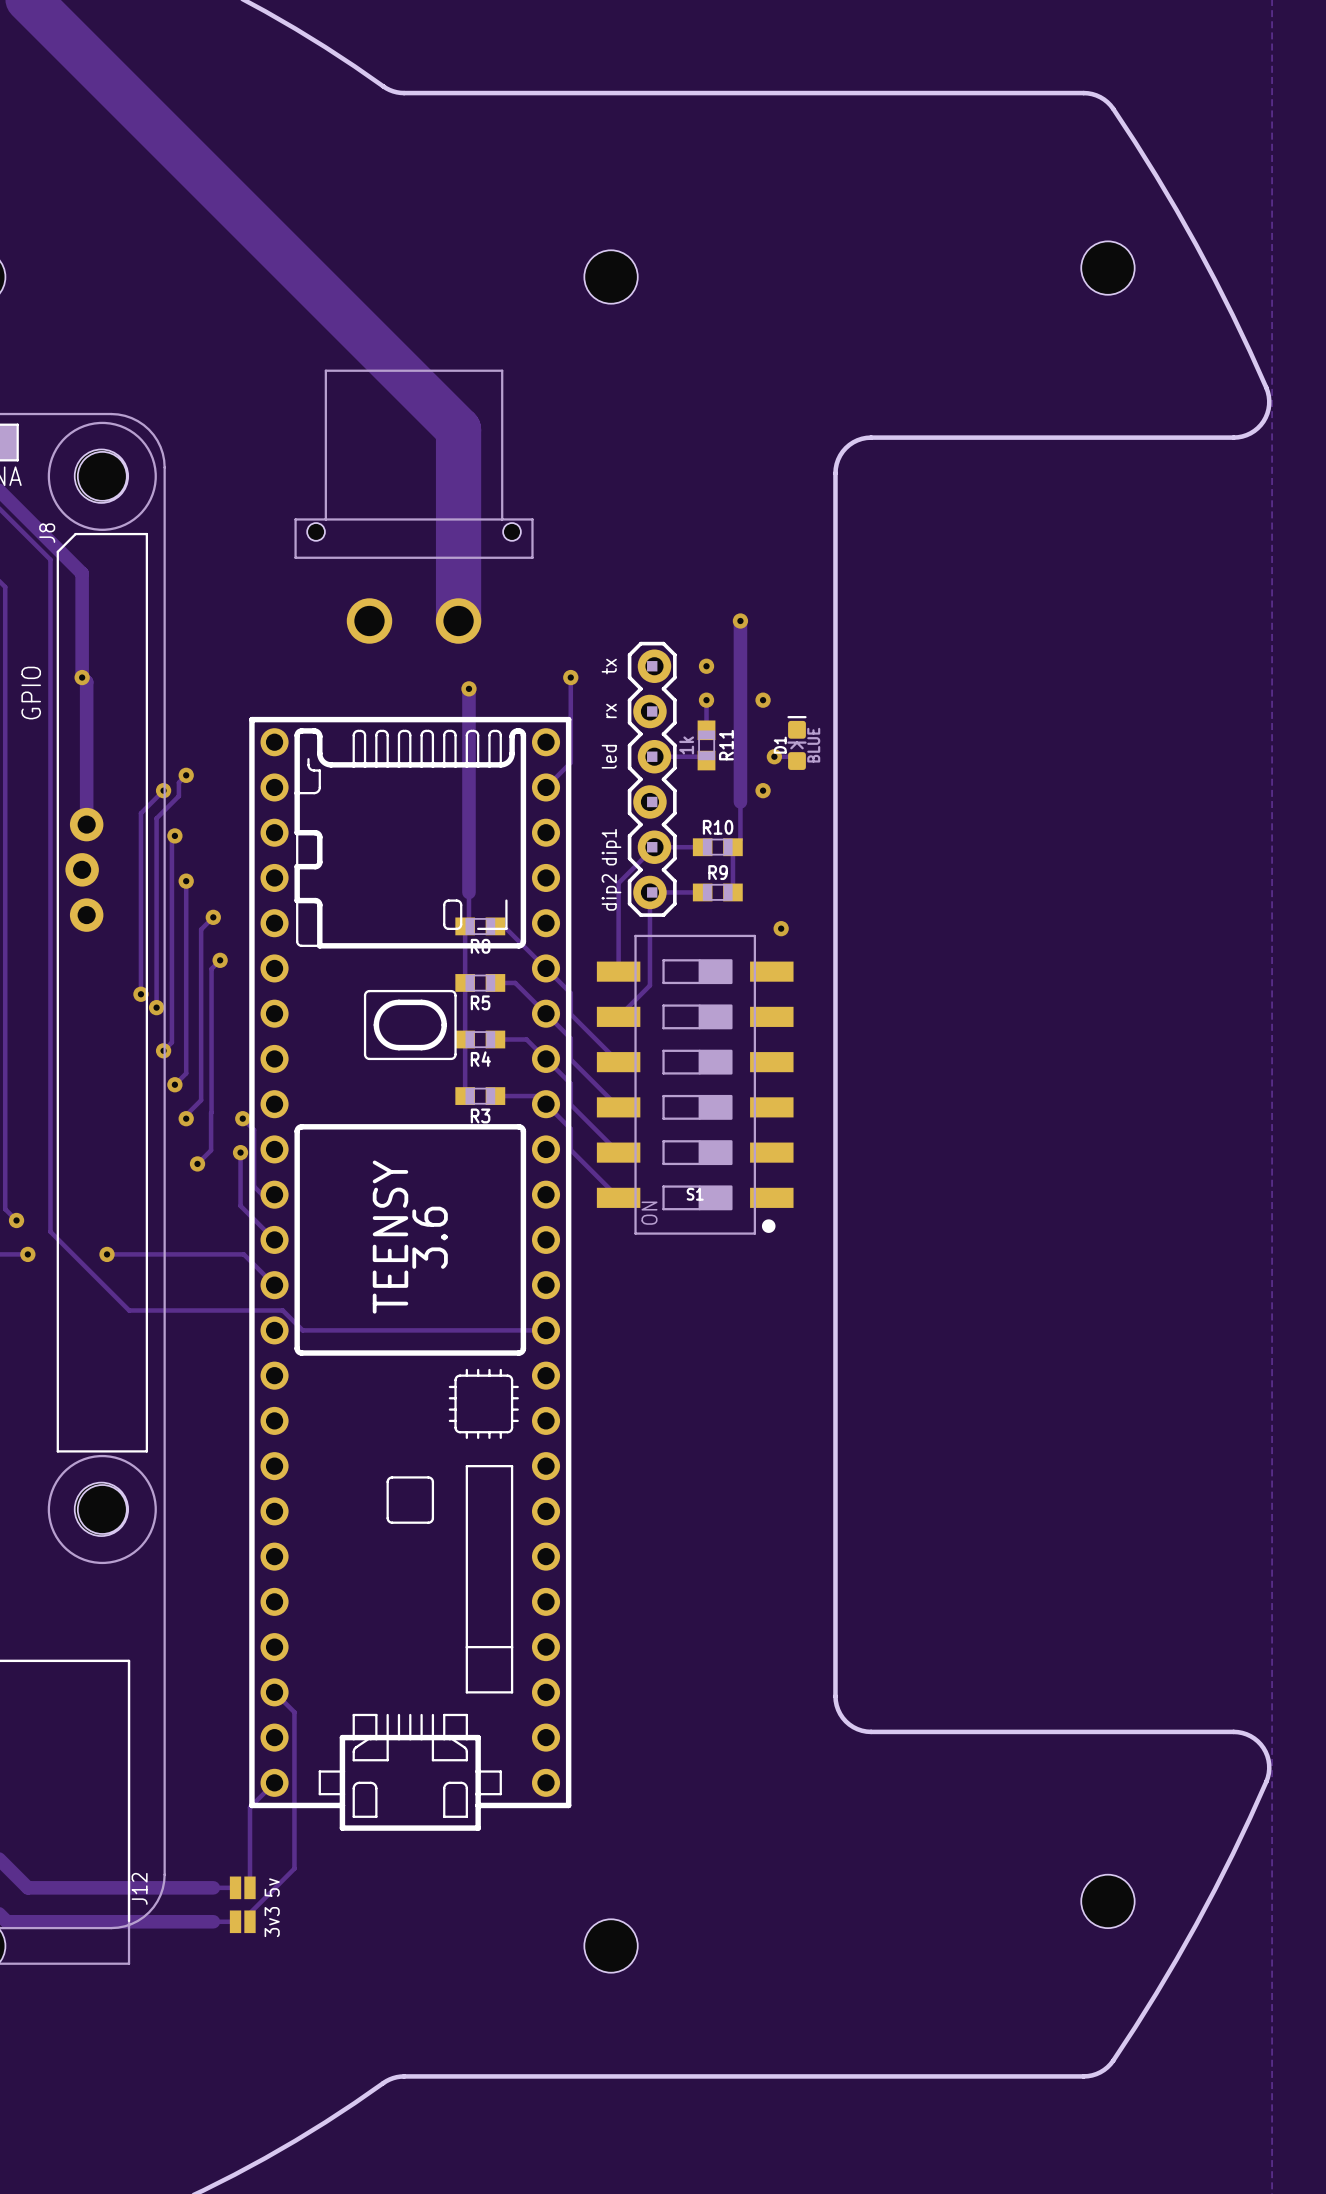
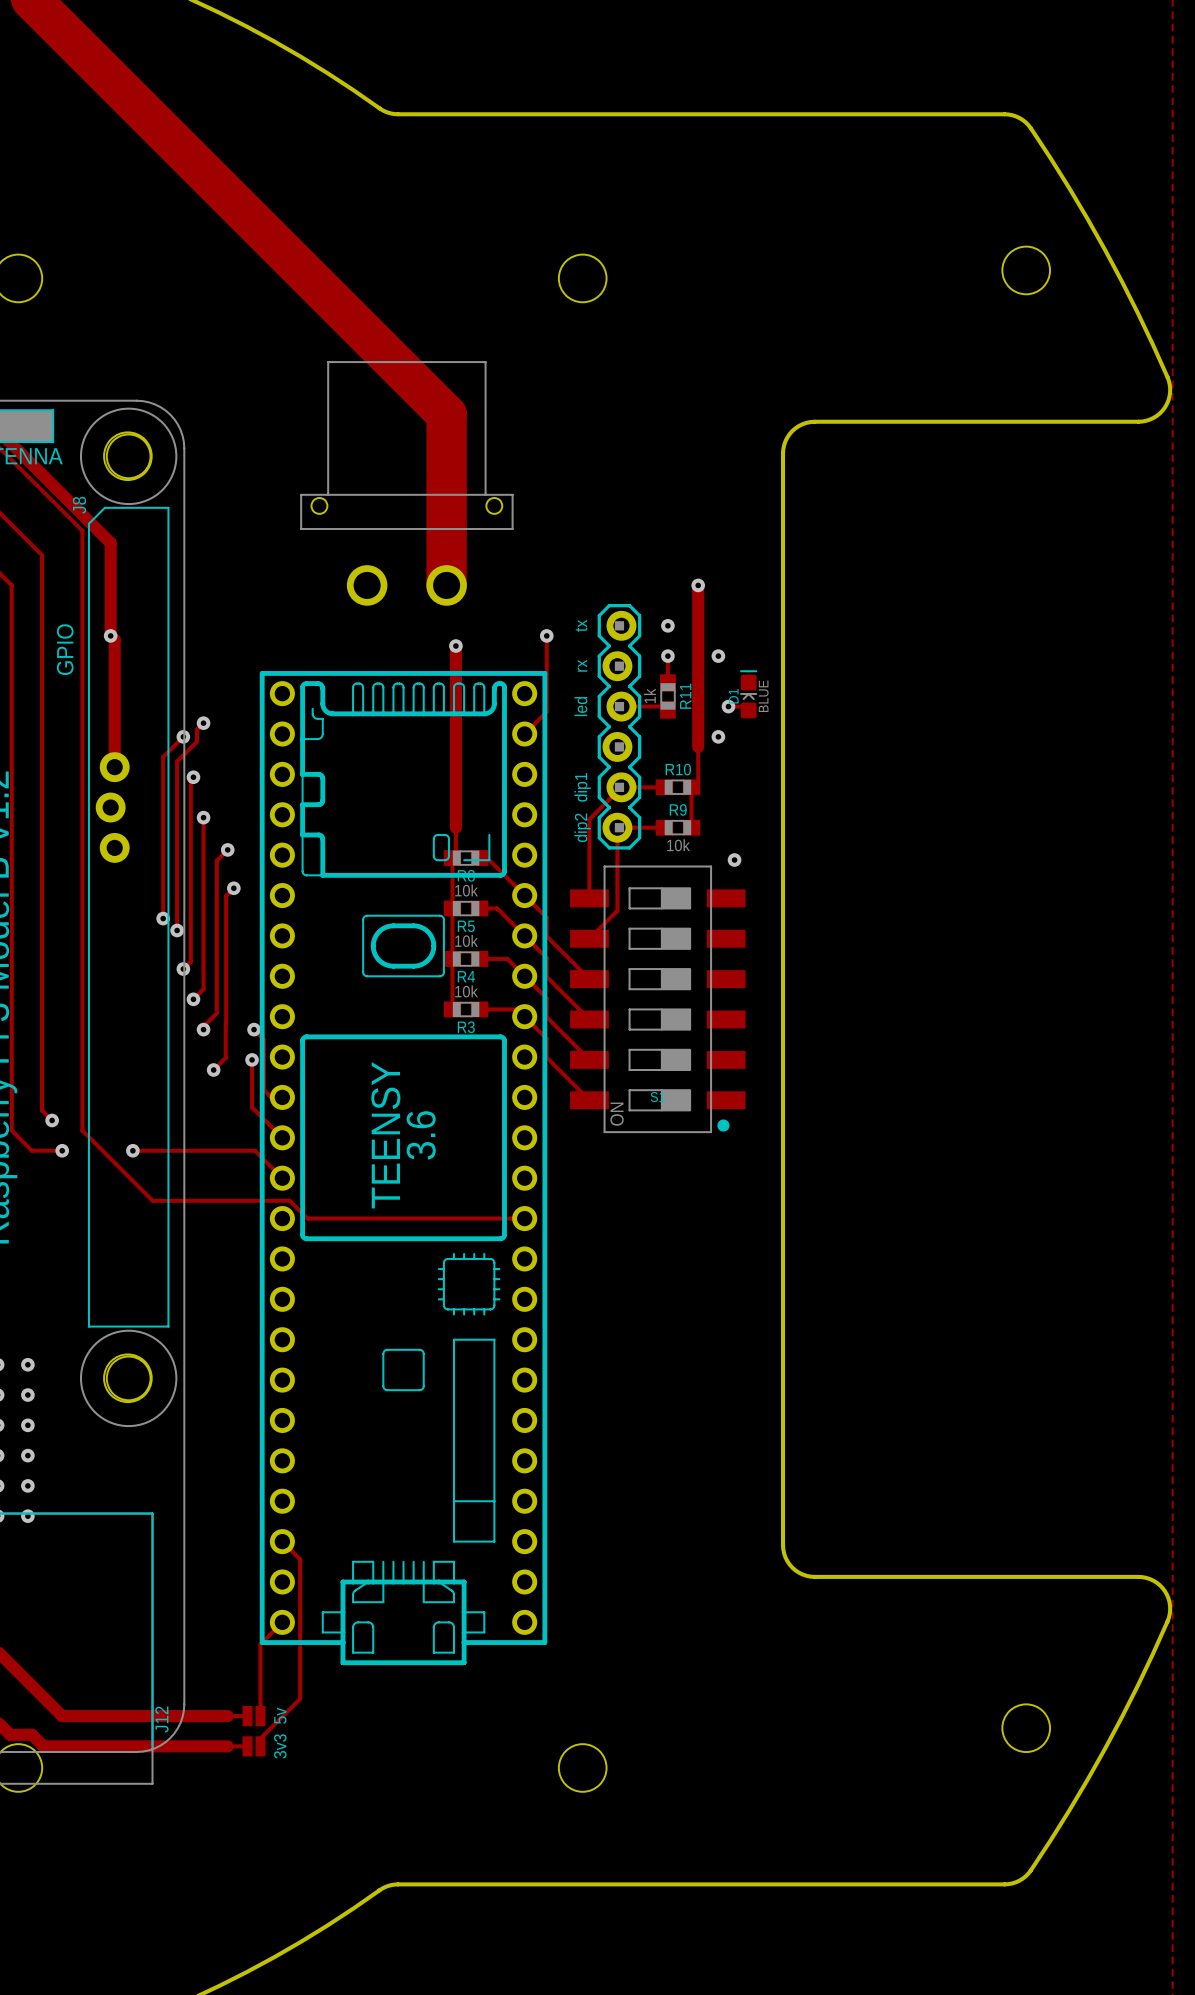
R9 value: none -> 10k (678, 845)
R5 value: none -> 10k (466, 890)
R4 value: none -> 10k (466, 940)
R3 value: none -> 10k (466, 991)

